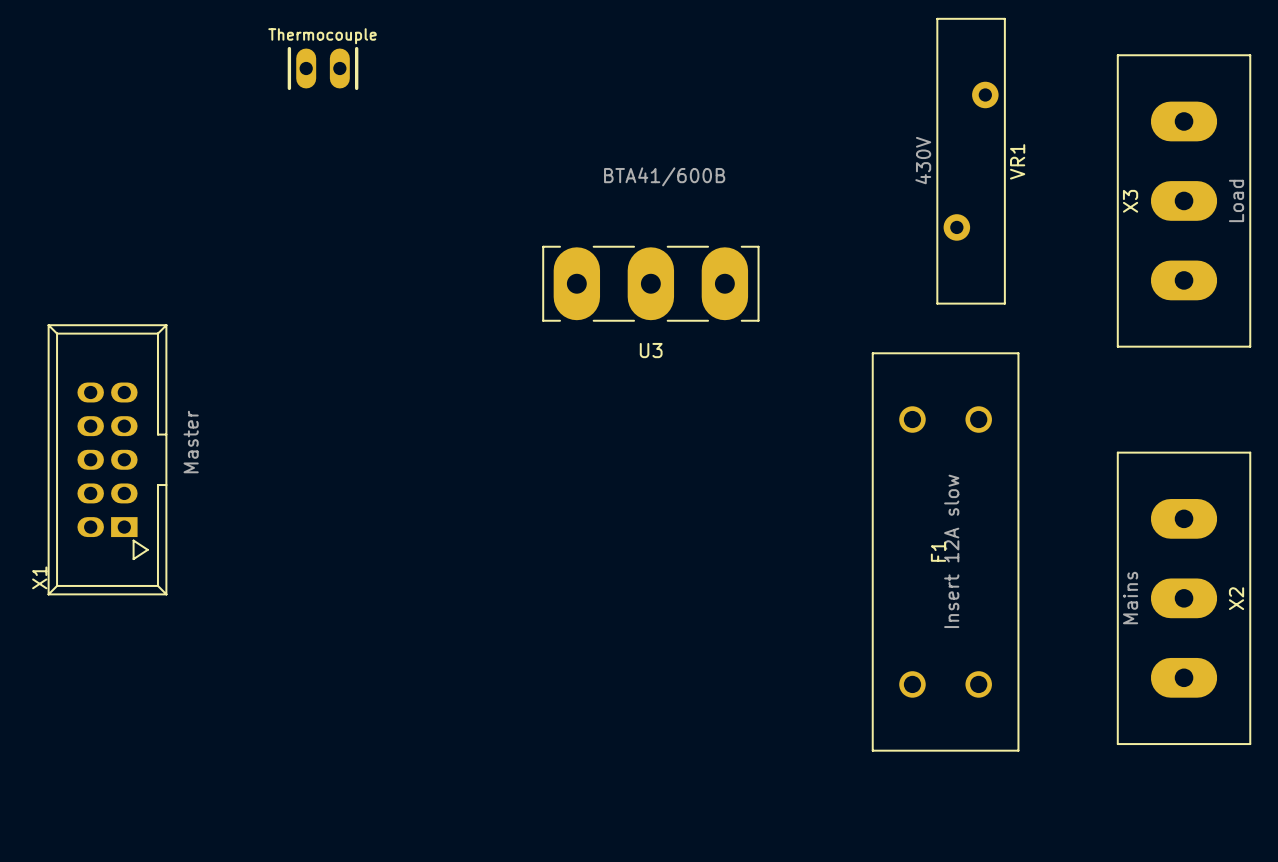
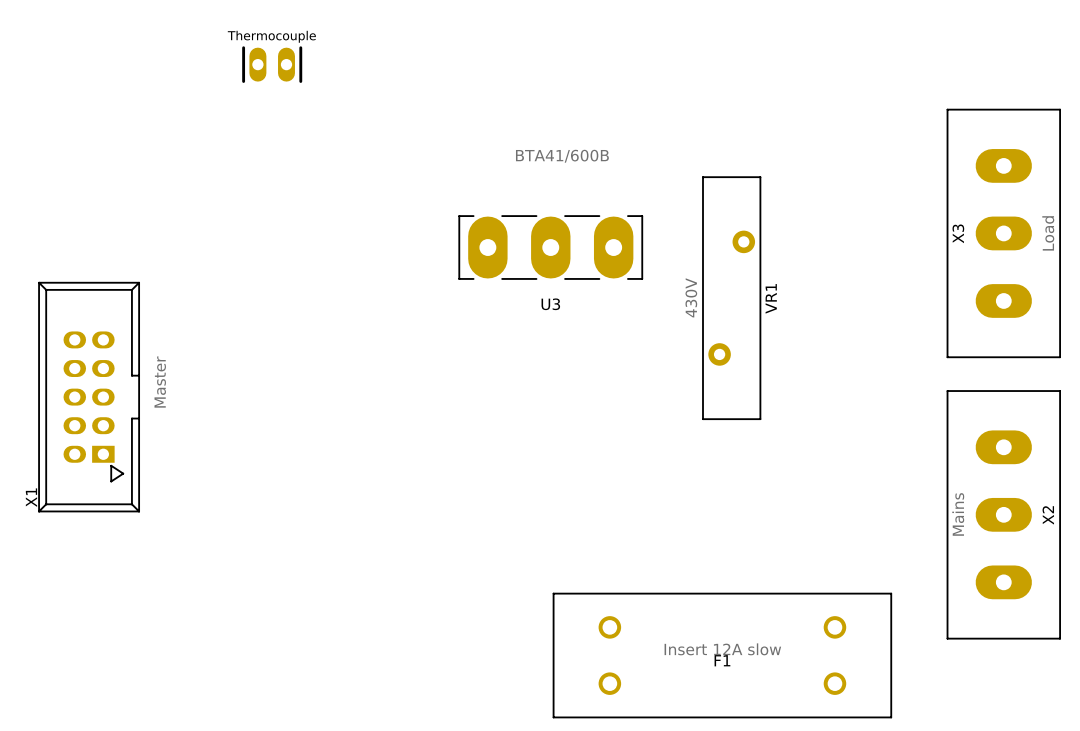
VR1 position: (971, 161) -> (731, 298)
X3 position: (1184, 200) -> (1003, 233)
F1 rotation: 0° (945, 551) -> 90° clockwise (722, 655)

